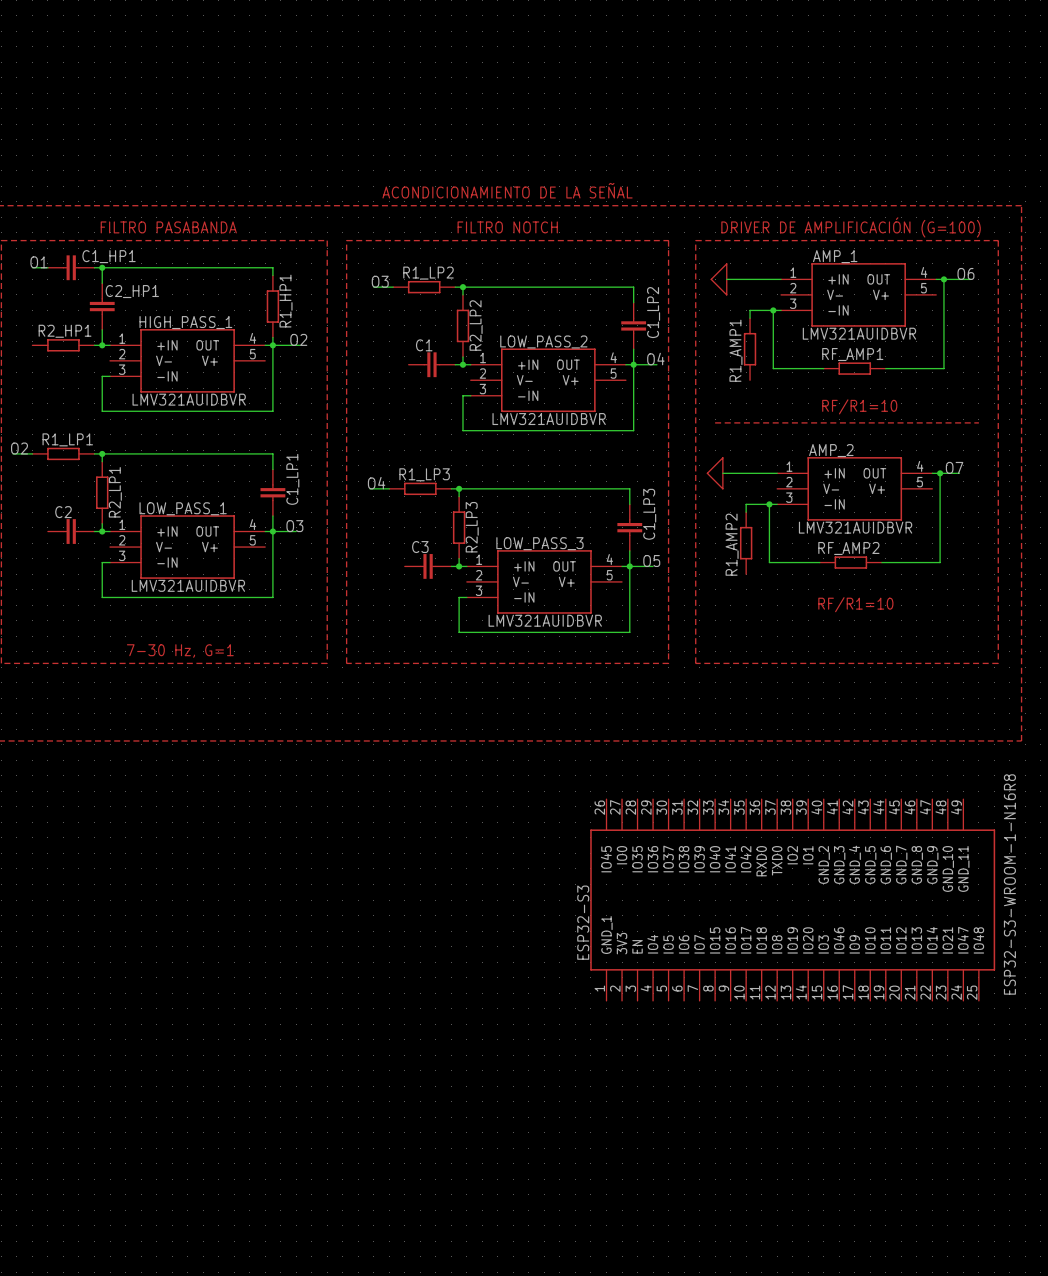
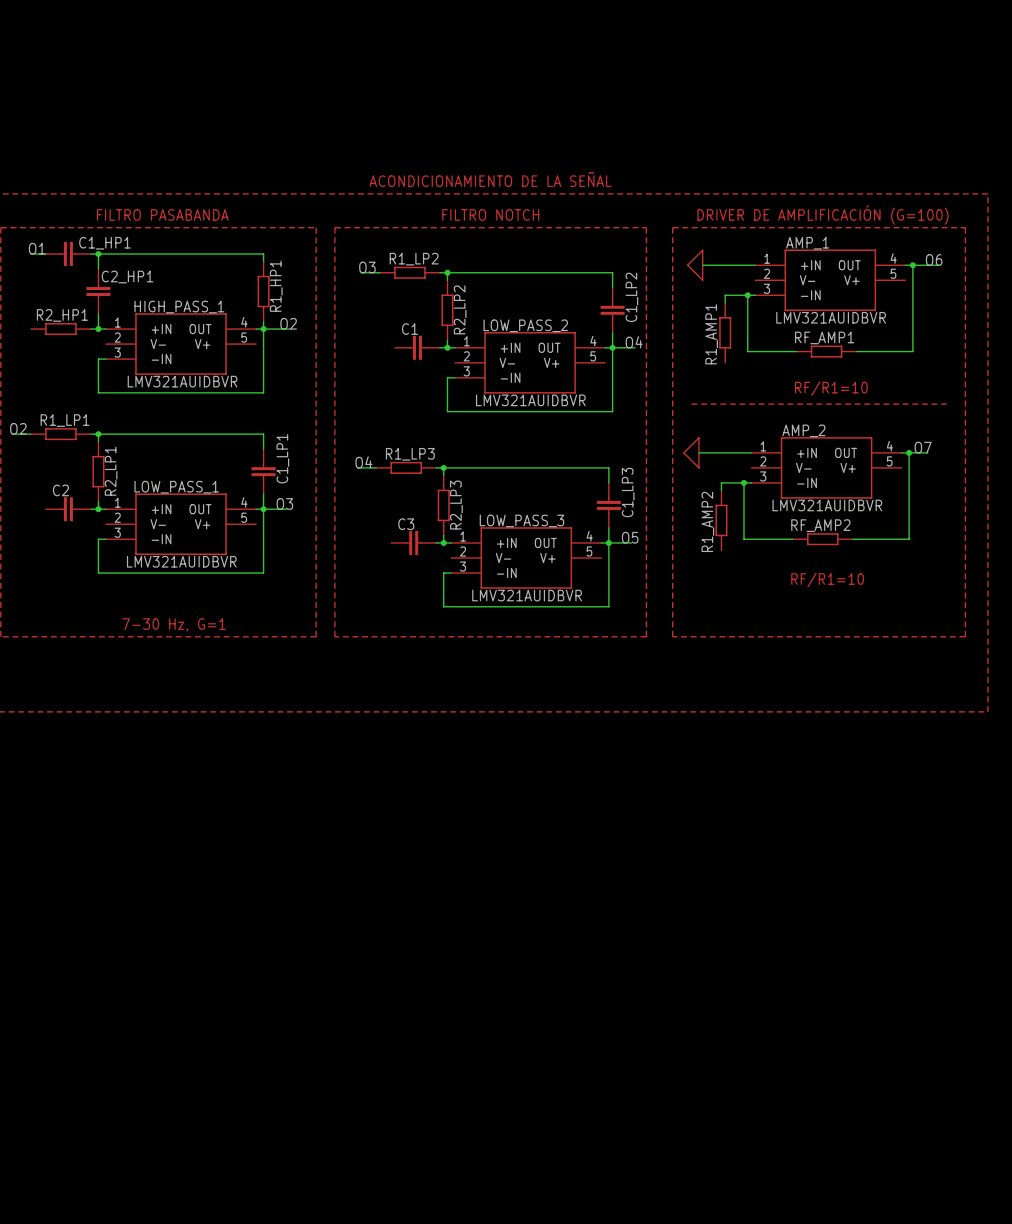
ESP32-S3: ESP32-S3-WROOM-1-N16R8 (792, 900) -> none

